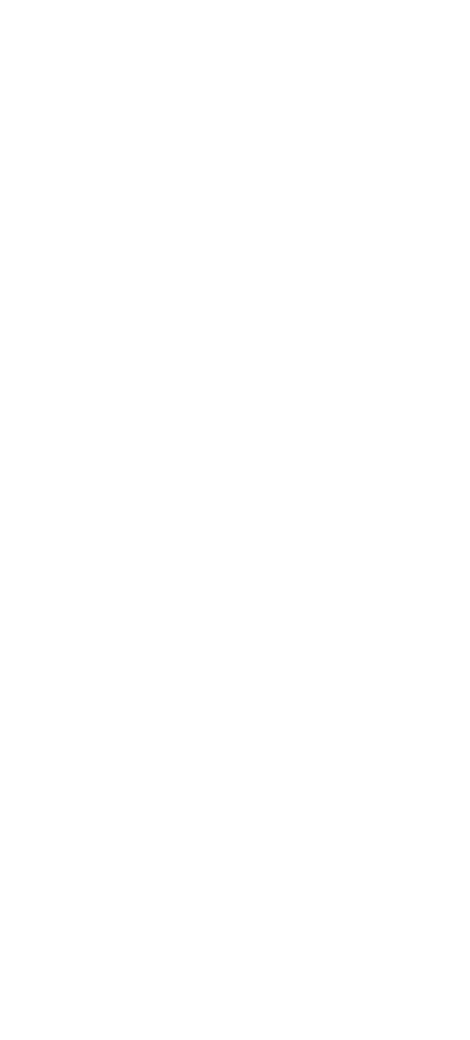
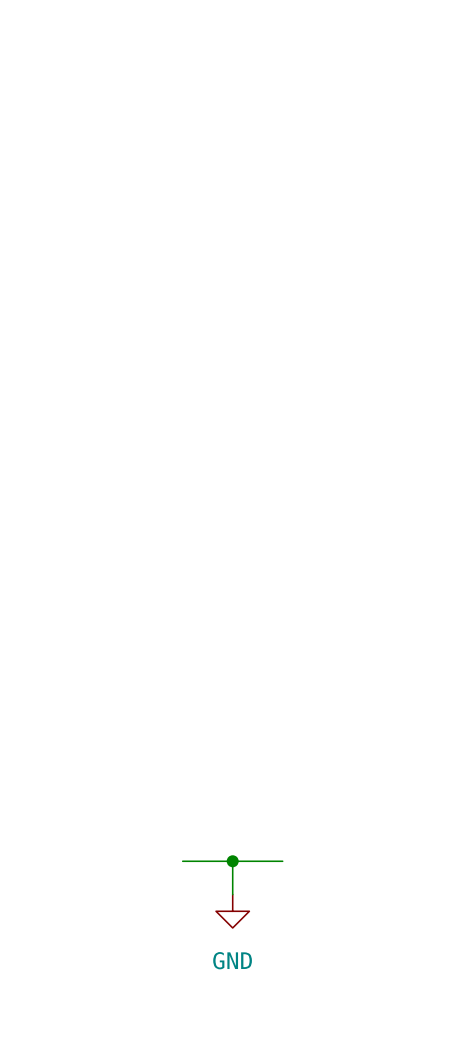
wire: none -> (182, 861) (282, 861)
wire: none -> (232, 861) (232, 894)
junction: none -> (232, 861)
power symbol: none -> GND (232, 911)

